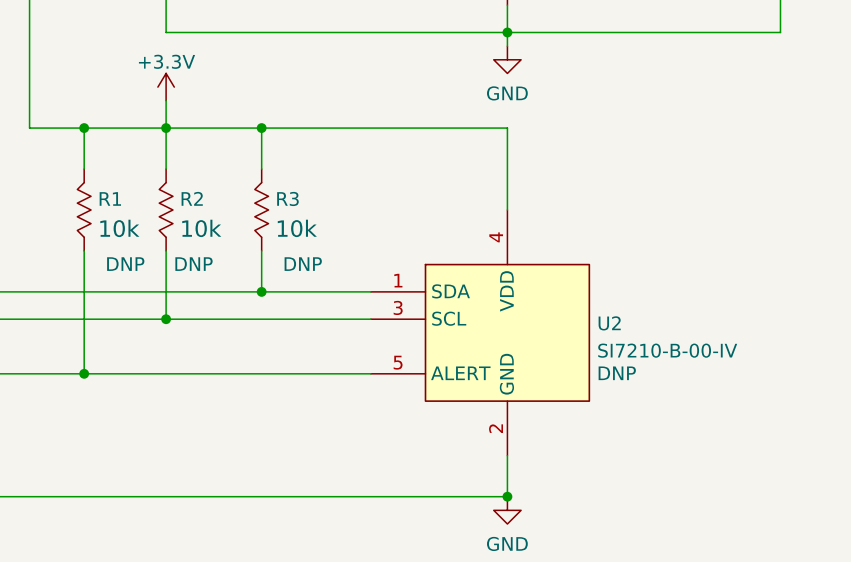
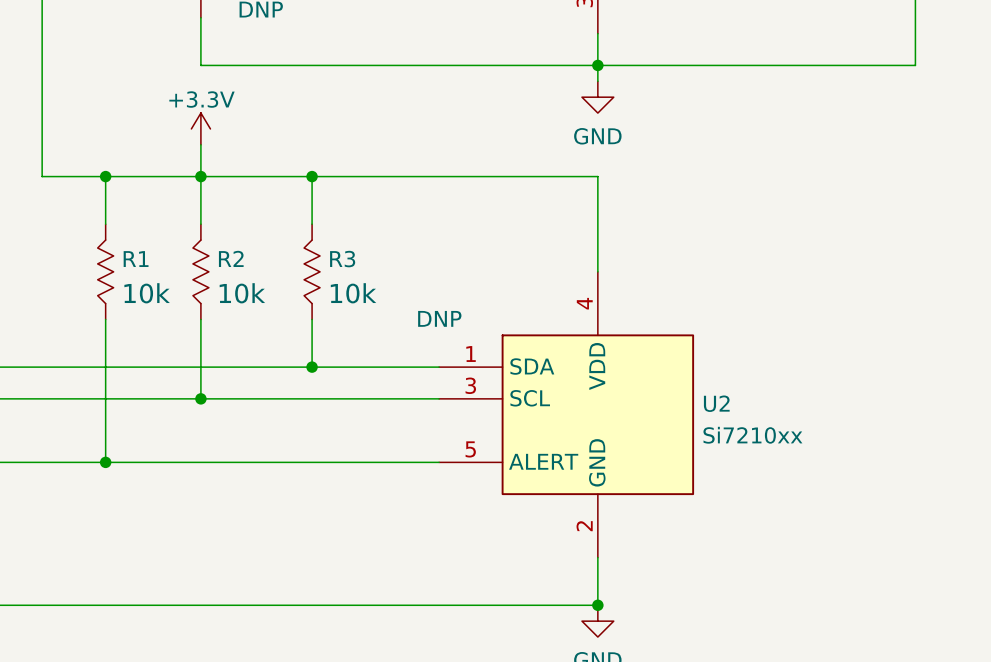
R1 text: DNP (125, 264) -> none
R2 text: DNP (194, 264) -> none
R3 text: DNP (303, 264) -> none
U2 text: SI7210-B-00-IV (667, 350) -> Si7210xx (752, 435)
U2 text position: DNP (617, 373) -> DNP (439, 318)

